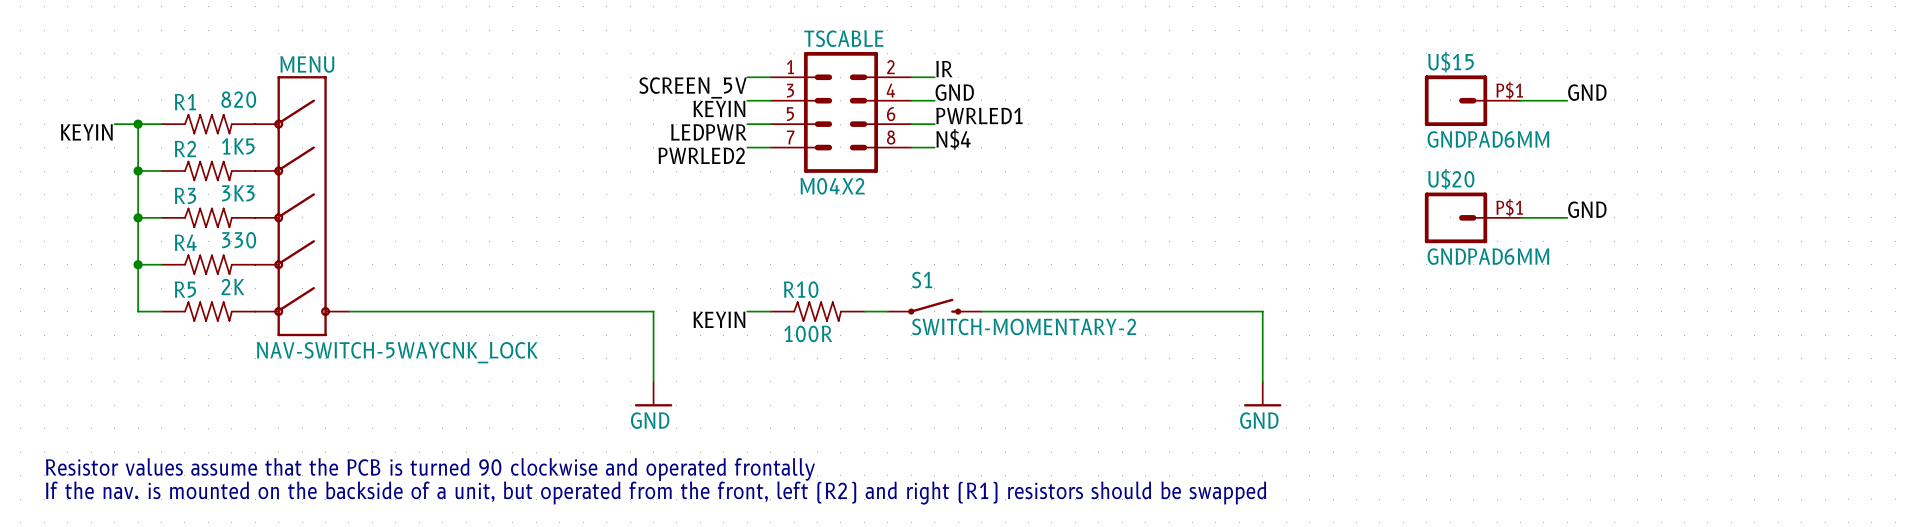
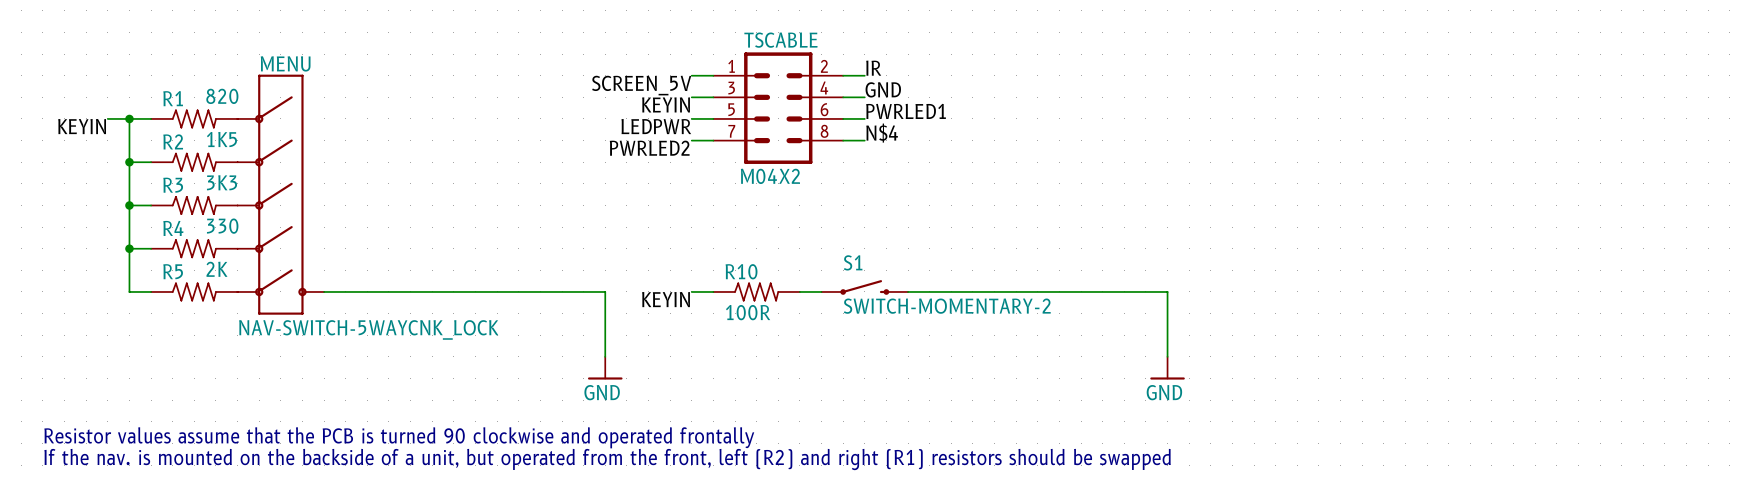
label: GND (1587, 92) -> none
U$15: GNDPAD6MM (1472, 100) -> none
wire: (1520, 100) (1567, 100) -> none
label: GND (1587, 209) -> none
U$20: GNDPAD6MM (1472, 217) -> none
wire: (1520, 217) (1567, 217) -> none

